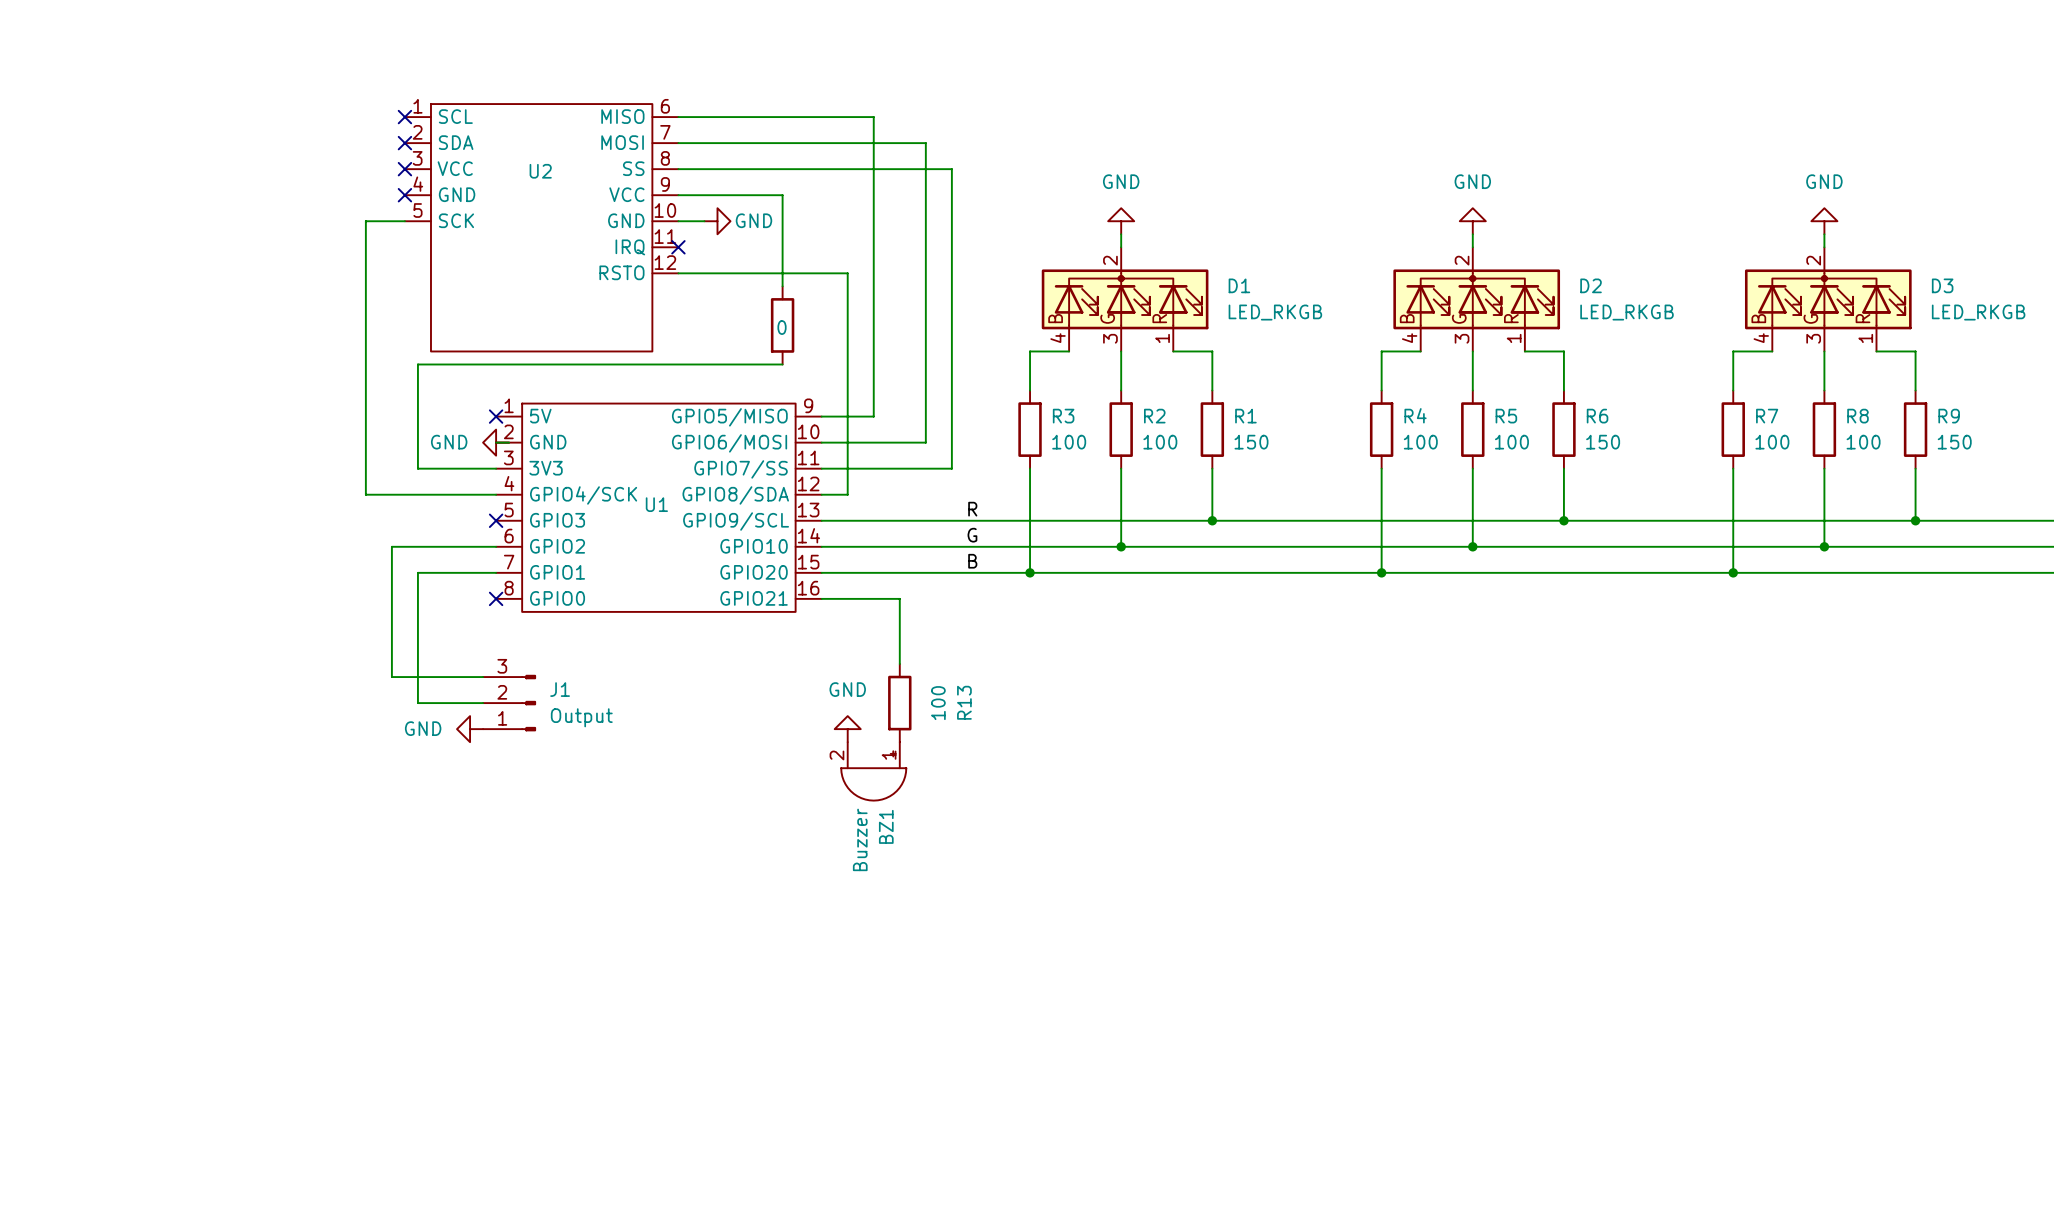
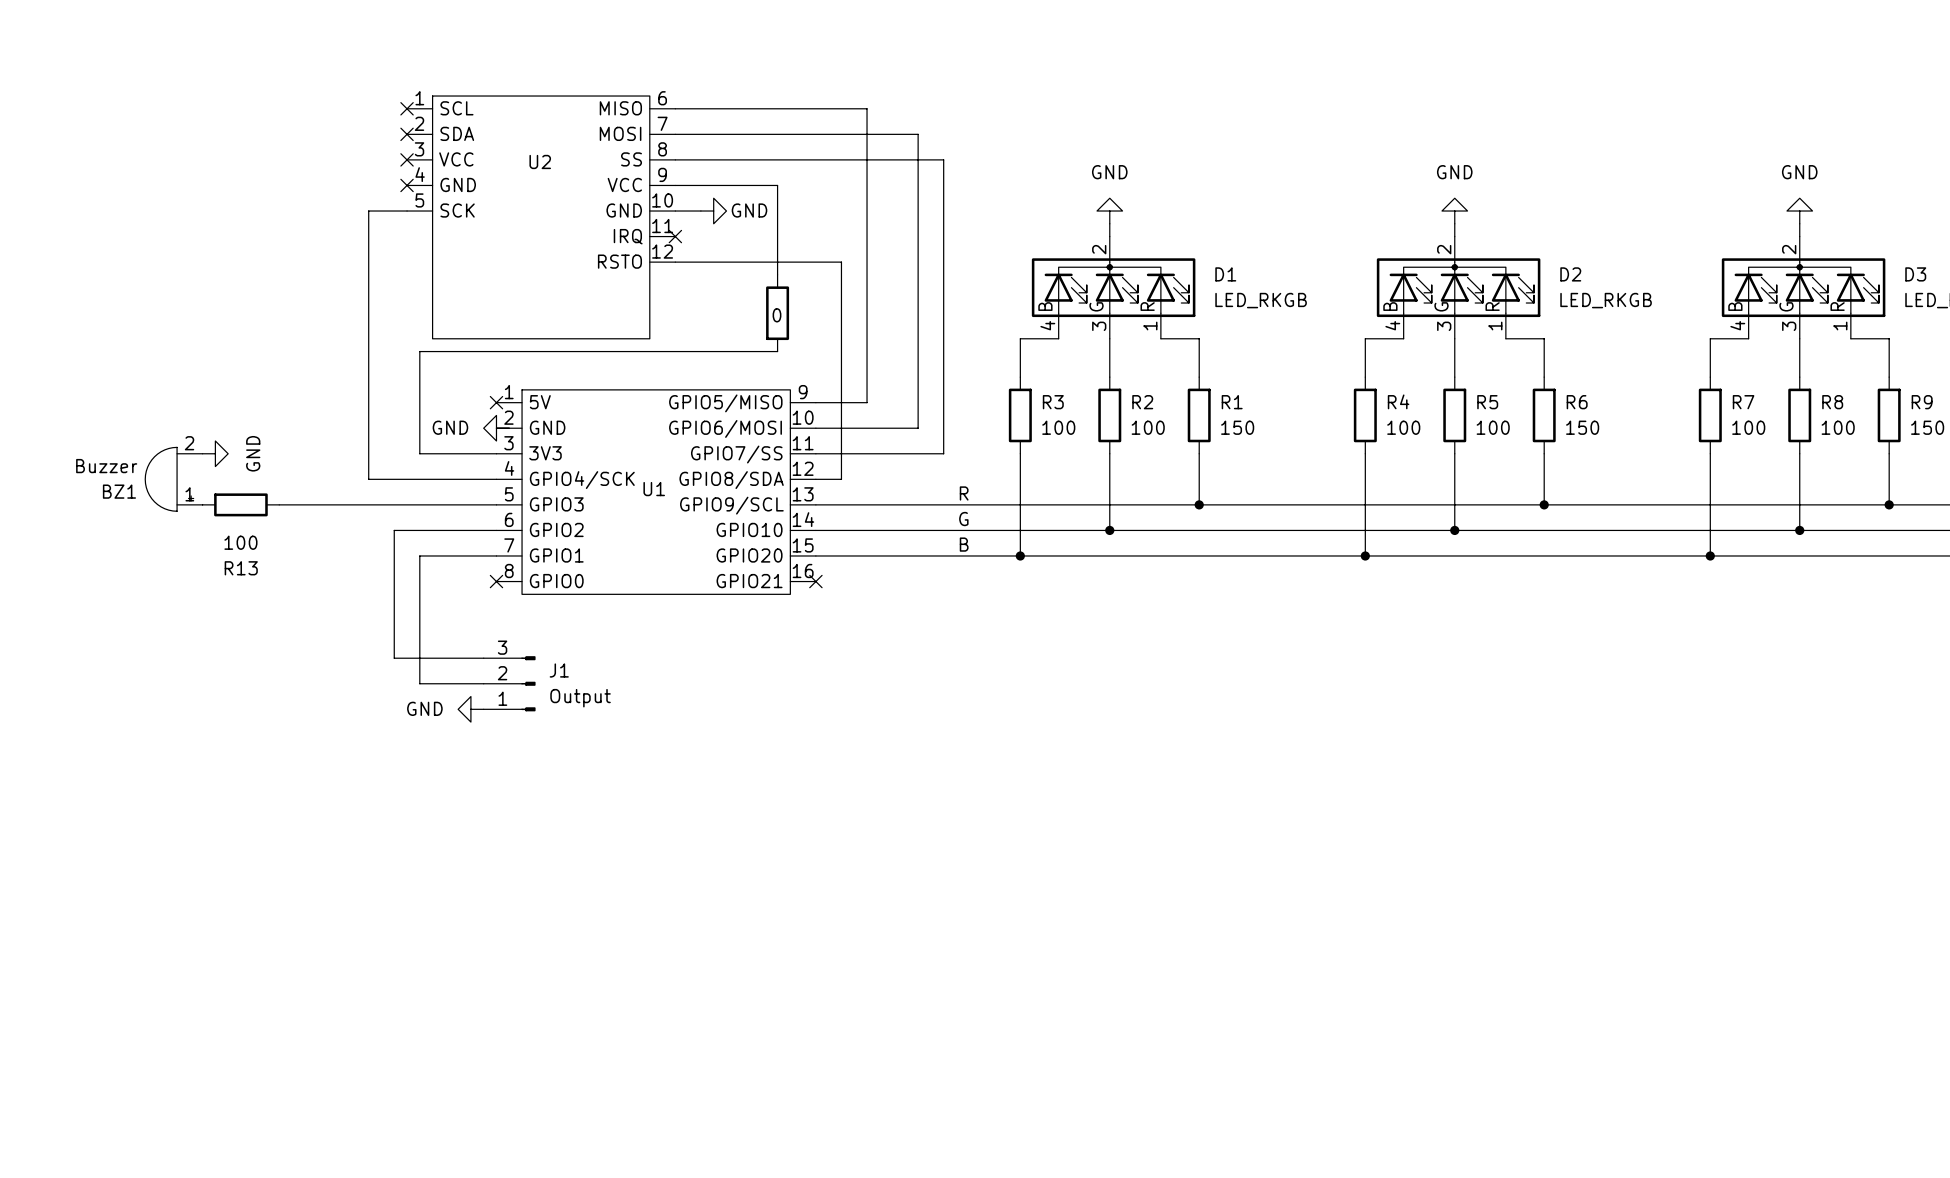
power symbol: none -> GND (215, 453)
wire: none -> (279, 504) (496, 504)
no-connect mark: (496, 520) -> none
wire: (821, 598) (899, 598) (899, 664) -> none
no-connect mark: none -> (815, 581)
R13 rotation: 0° (899, 703) -> 90° clockwise (240, 504)
R13 position: (899, 703) -> (240, 504)
power symbol: GND (847, 729) -> none
BZ1 position: (873, 771) -> (173, 479)
BZ1 rotation: 0° (873, 775) -> 90° clockwise (169, 479)

